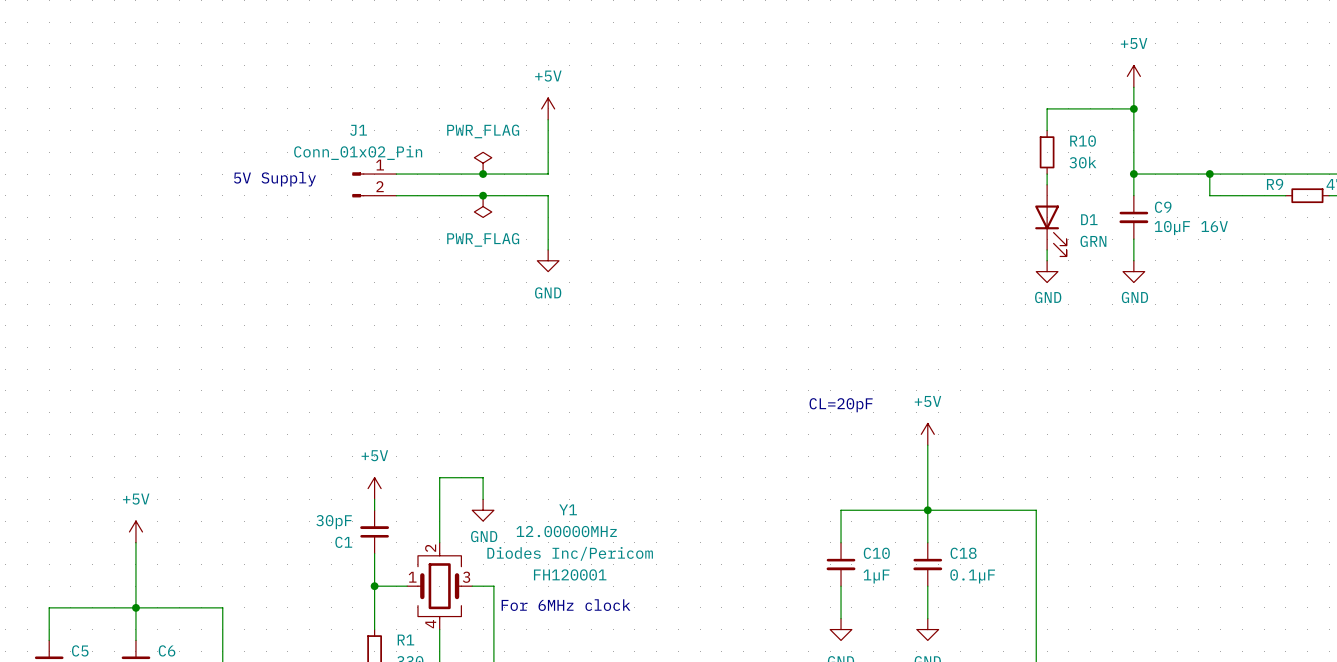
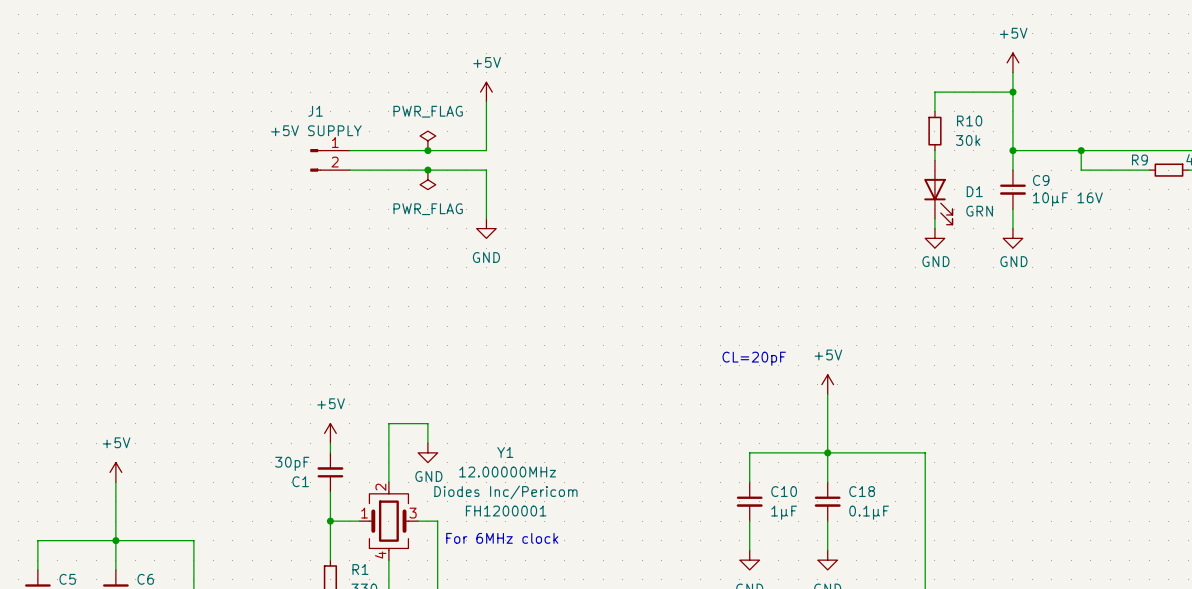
J1 value: Conn_01x02_Pin (358, 152) -> +5V SUPPLY (316, 130)
text: 5V Supply (274, 179) -> none
Y1 text: FH120001 (570, 574) -> FH1200001 (506, 511)

